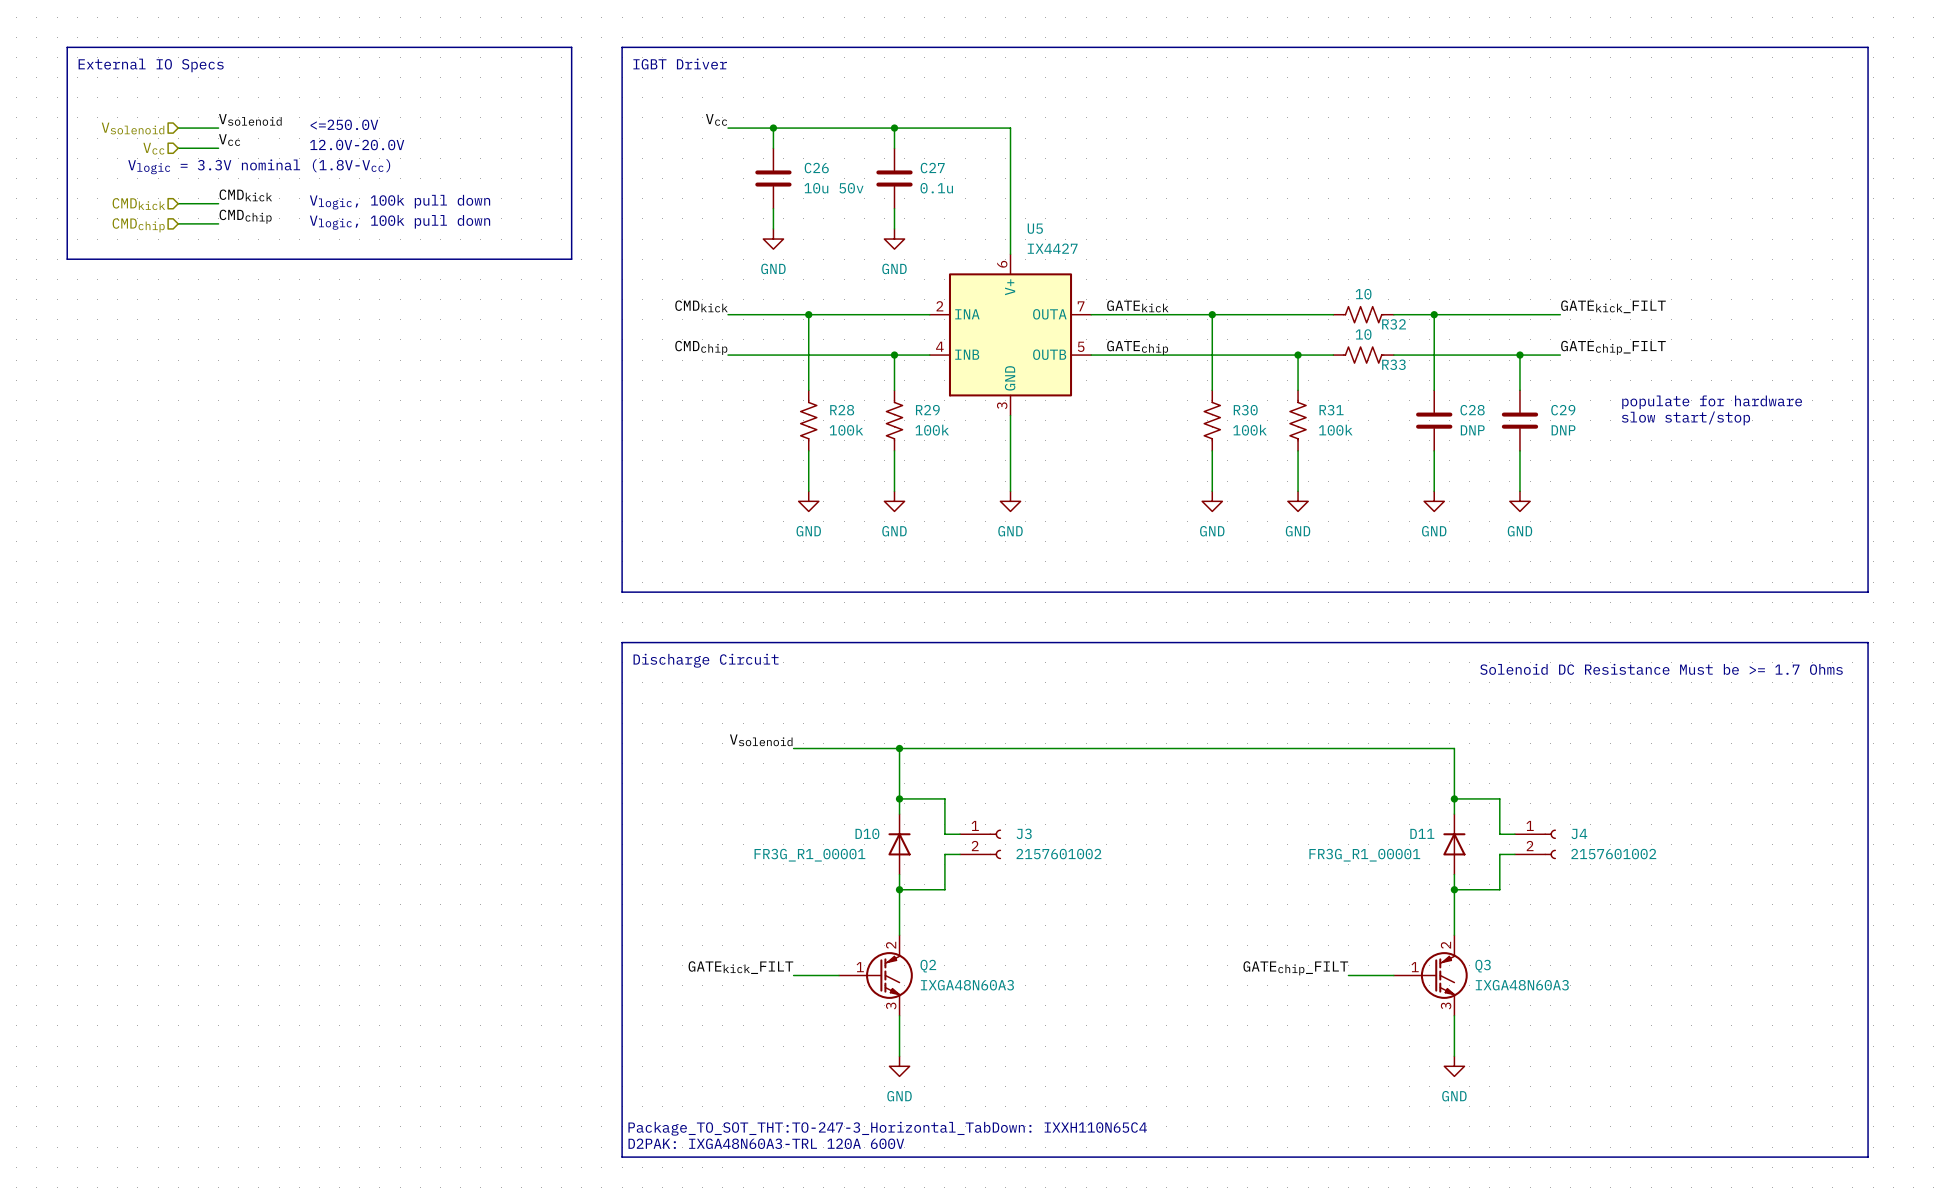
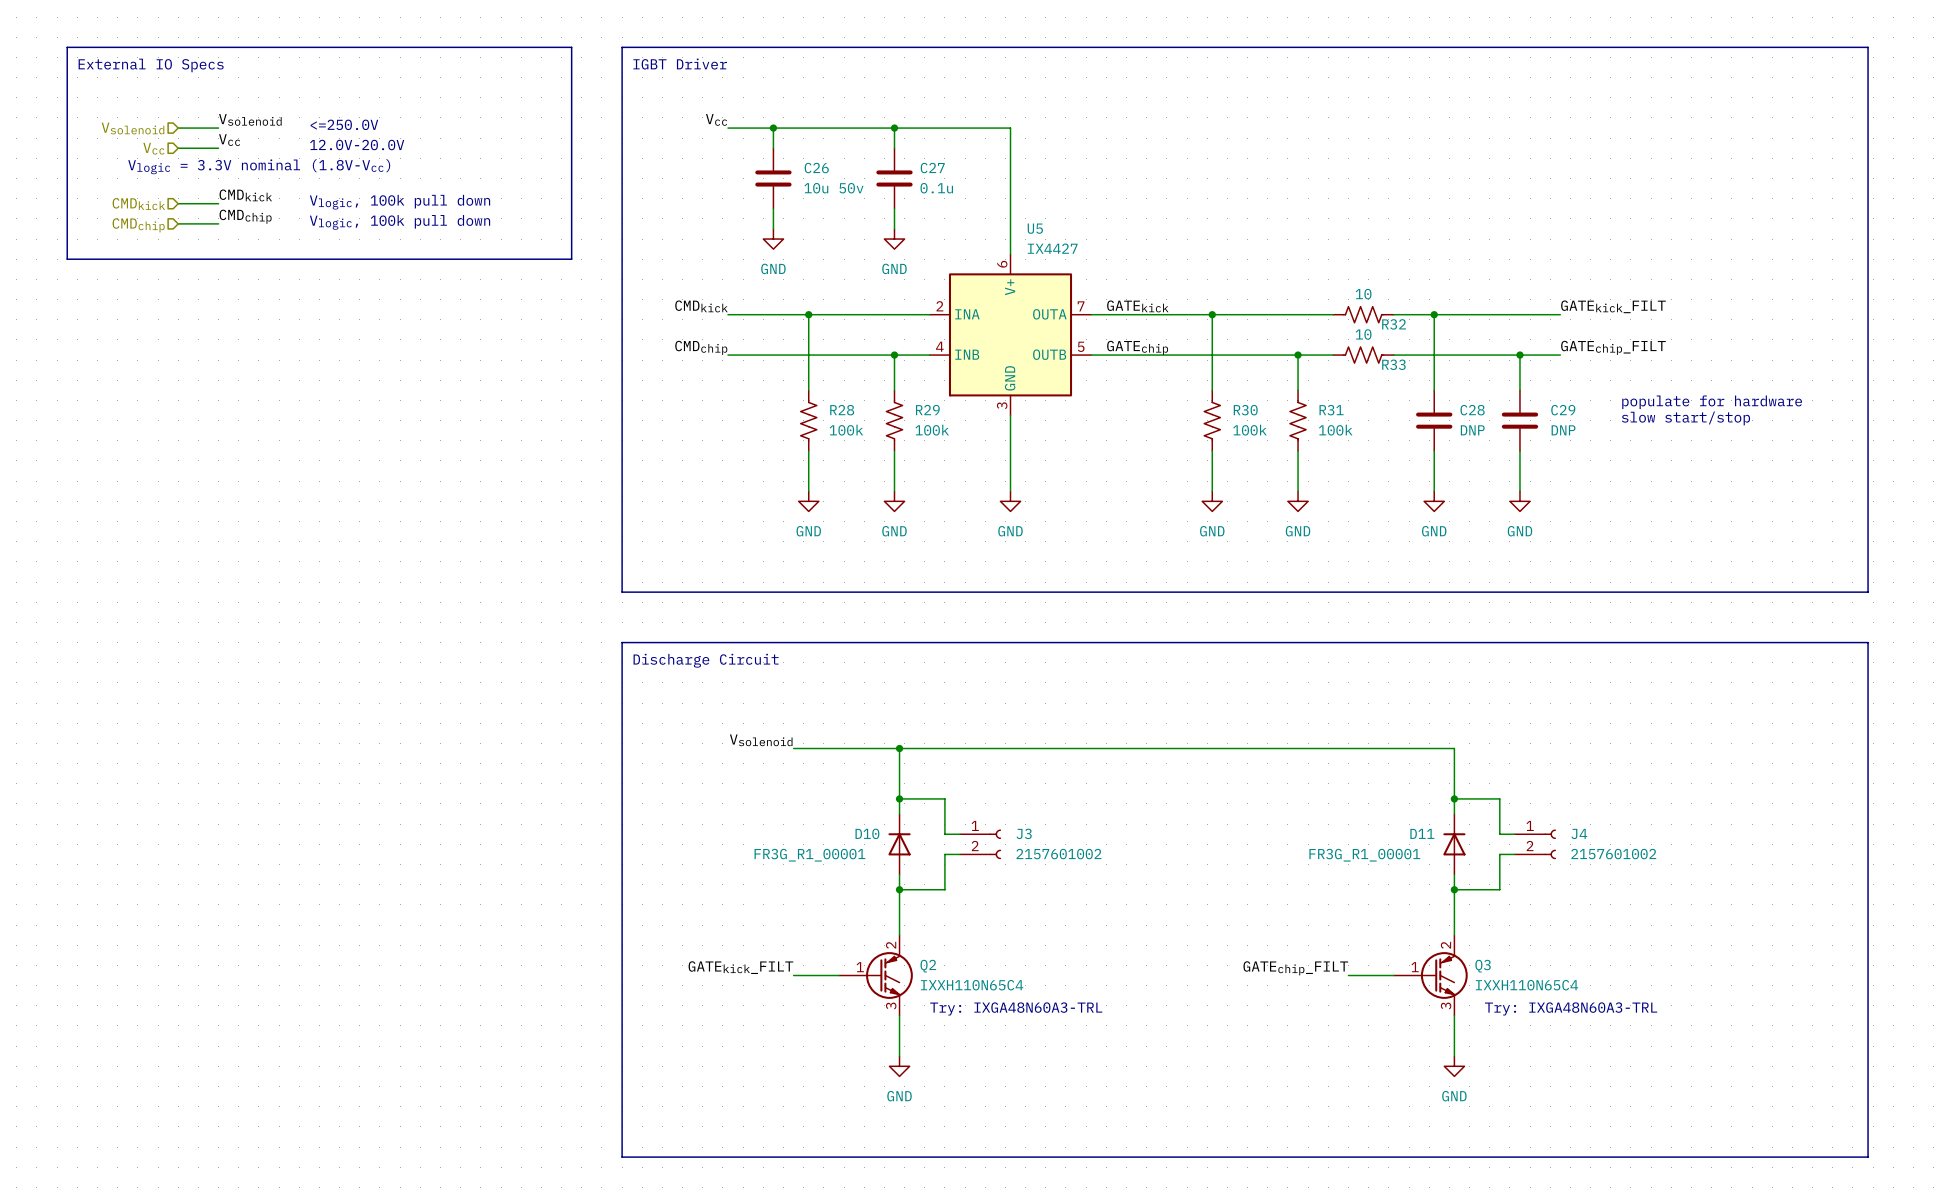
text: Solenoid DC Resistance Must be >= 1.7 Ohms (1661, 669) -> none
Q2 value: IXGA48N60A3 (967, 985) -> IXXH110N65C4 (972, 985)
Q3 value: IXGA48N60A3 (1522, 985) -> IXXH110N65C4 (1526, 985)
text: none -> Try: IXGA48N60A3-TRL (1016, 1008)
text: none -> Try: IXGA48N60A3-TRL (1571, 1008)
text: Package_TO_SOT_THT:TO-247-3_Horizontal_TabDown: IXXH110N65C4 (887, 1128) -> none
text: D2PAK: IXGA48N60A3-TRL 120A 600V (766, 1143) -> none

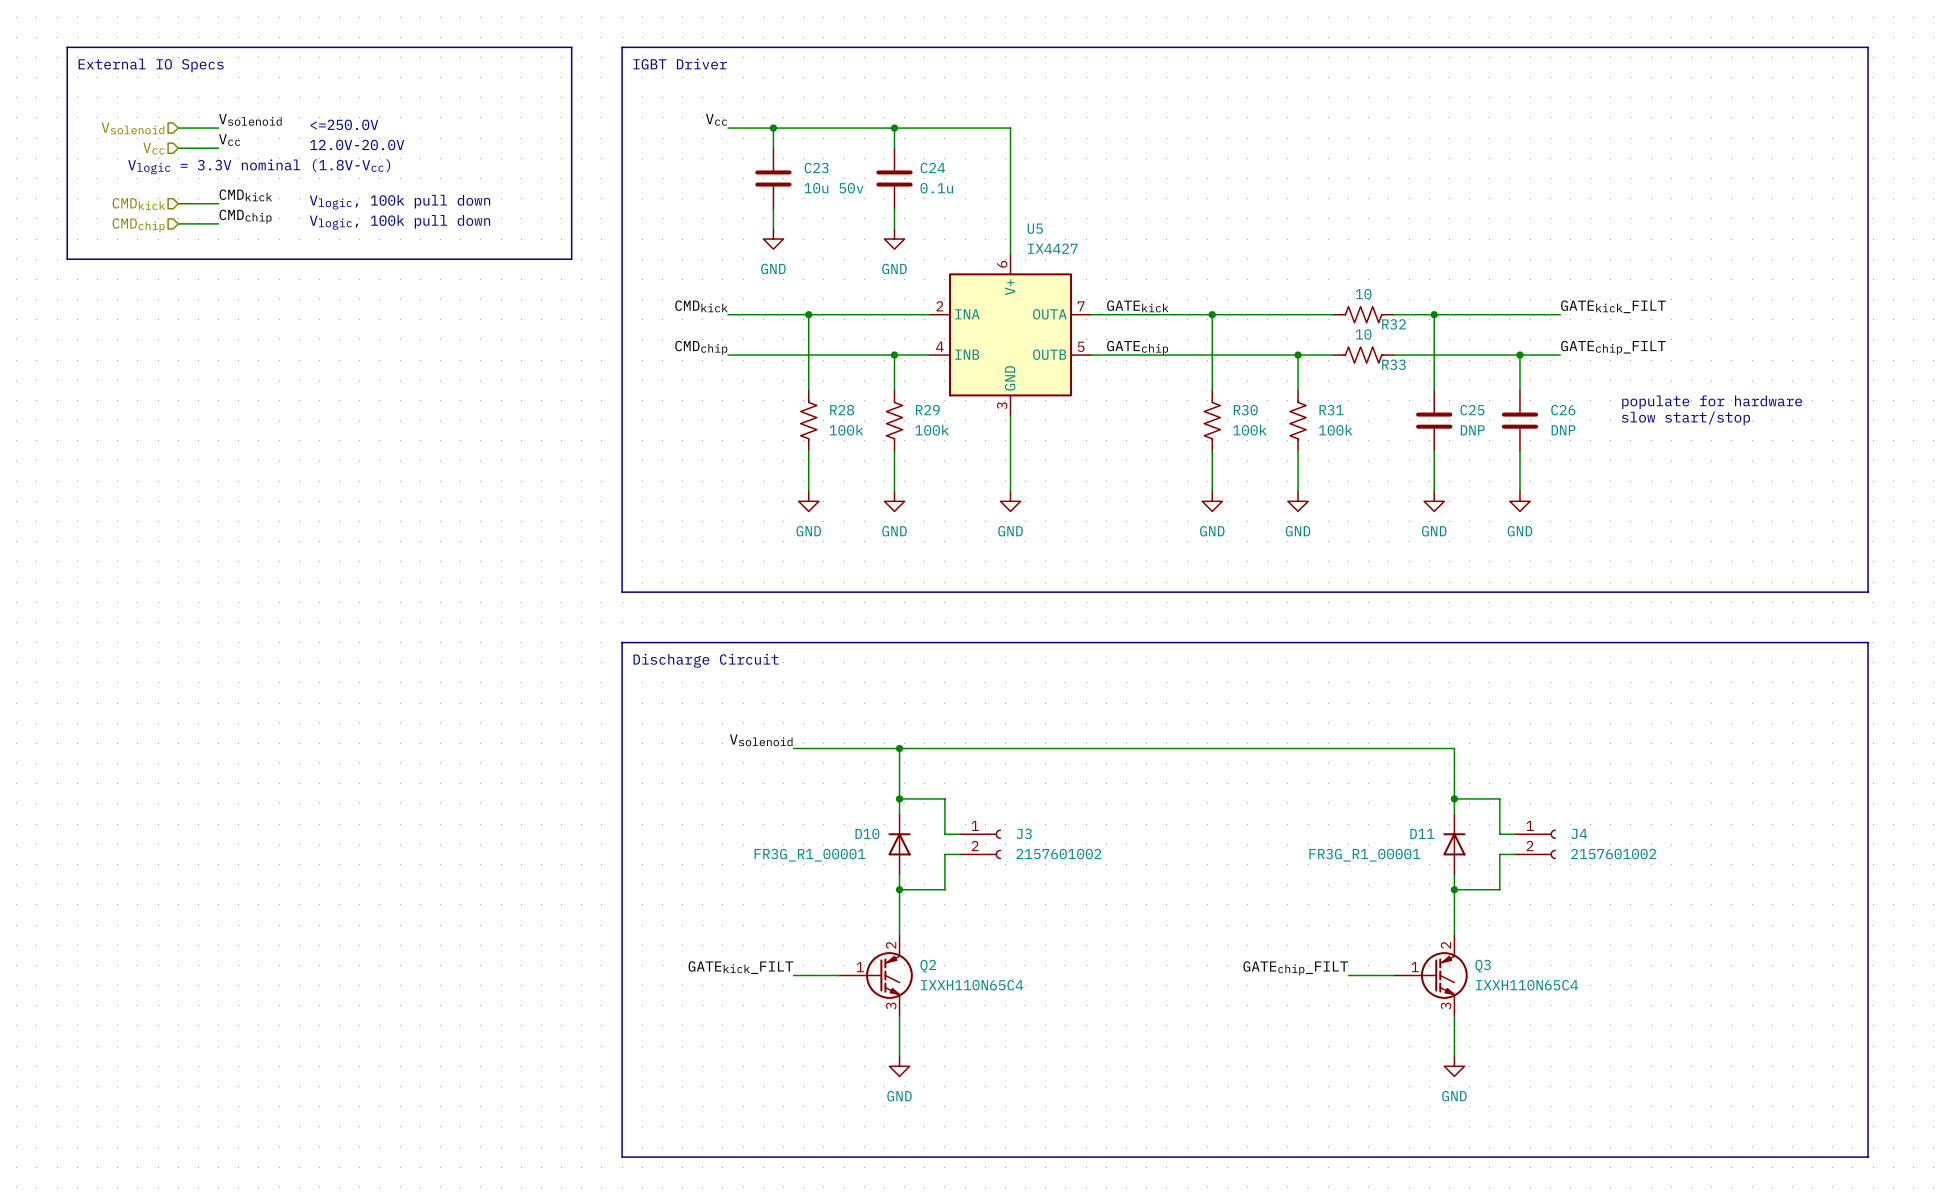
C26 name: C26 (816, 168) -> C23 (816, 168)
C27 name: C27 (932, 168) -> C24 (932, 168)
C28 name: C28 (1472, 410) -> C25 (1472, 410)
C29 name: C29 (1563, 410) -> C26 (1563, 410)
text: Try: IXGA48N60A3-TRL (1016, 1008) -> none
text: Try: IXGA48N60A3-TRL (1571, 1008) -> none

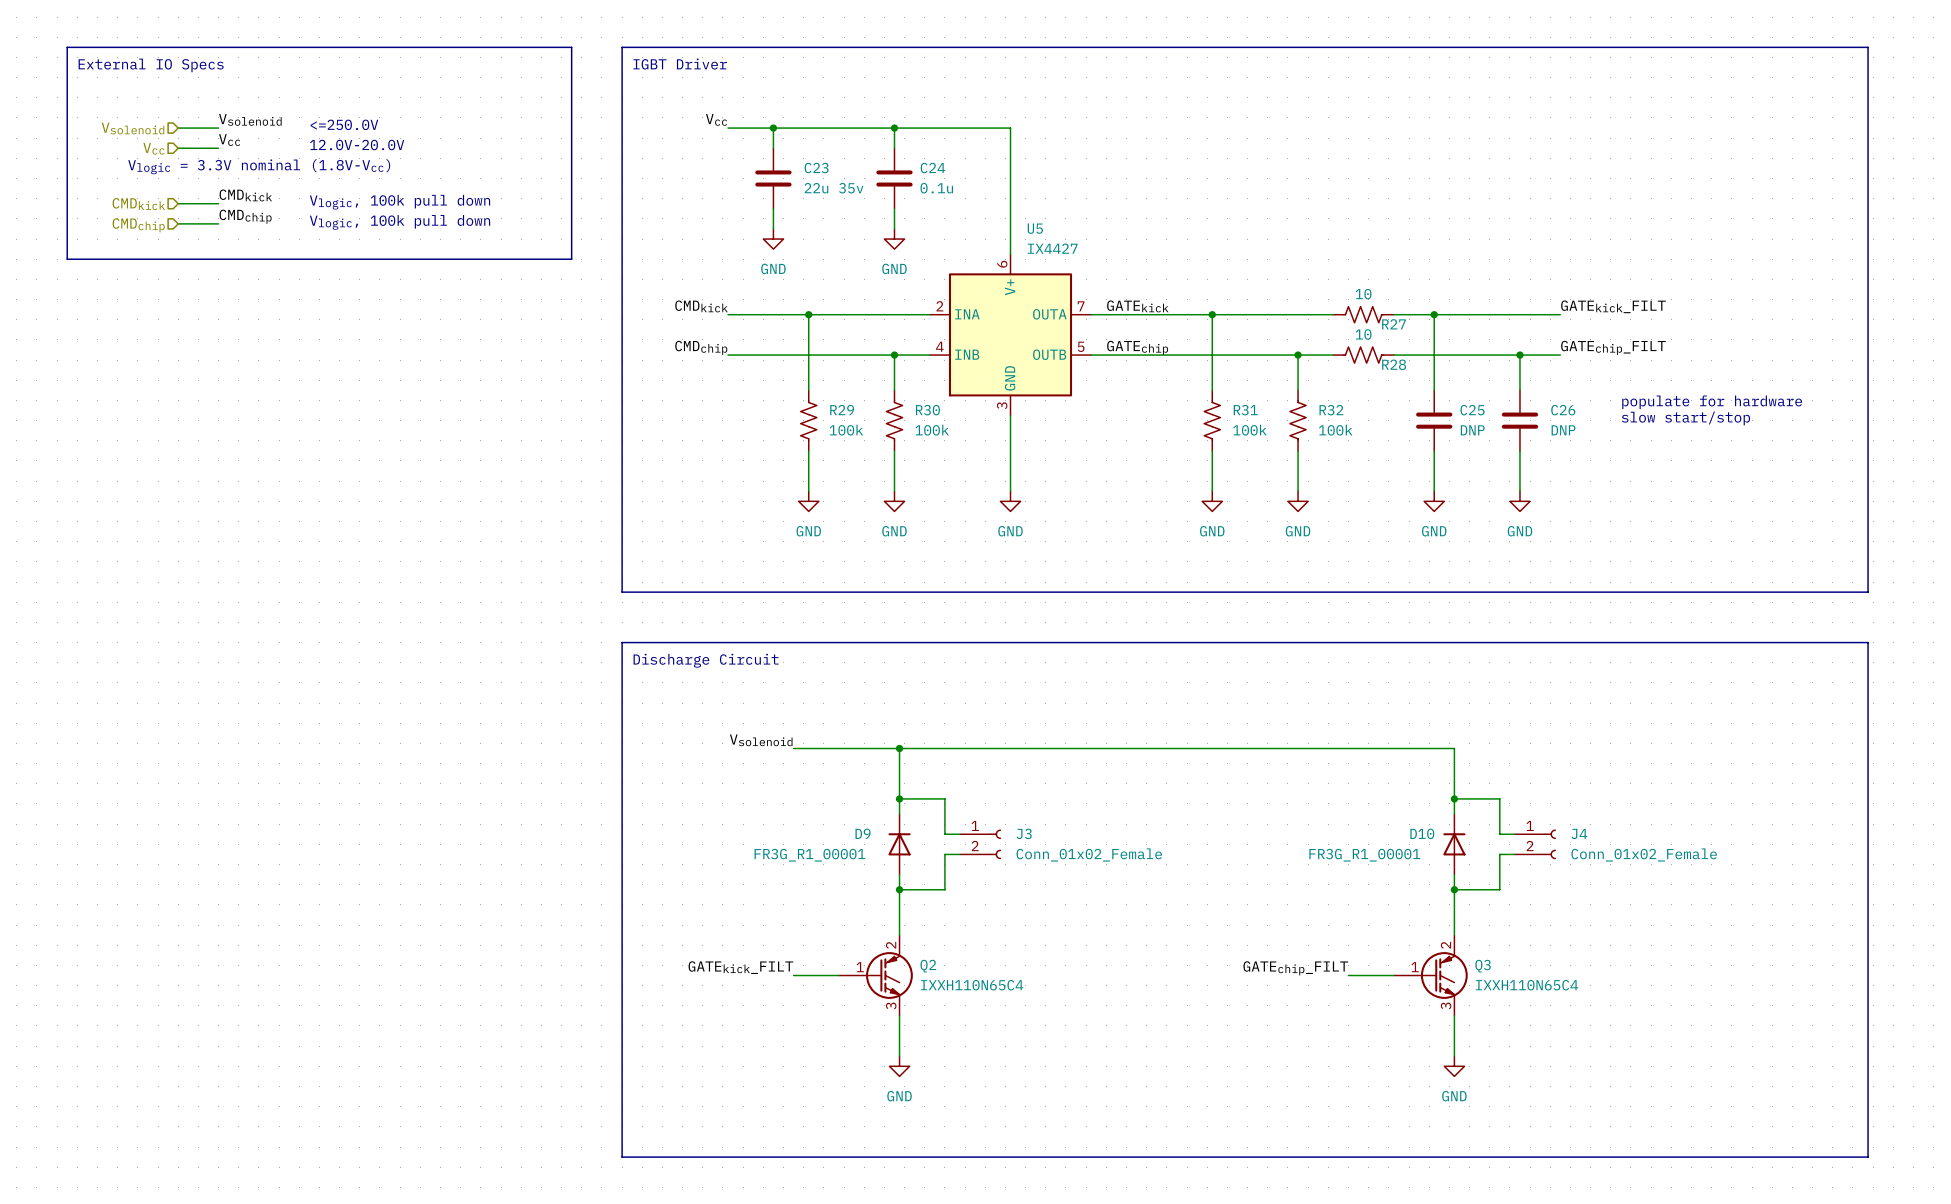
C23 value: 10u 50v (833, 188) -> 22u 35v (834, 188)
R32 name: R32 (1394, 324) -> R27 (1394, 324)
R33 name: R33 (1393, 364) -> R28 (1394, 364)
R28 name: R28 (842, 410) -> R29 (842, 410)
R29 name: R29 (927, 410) -> R30 (927, 410)
R30 name: R30 (1245, 410) -> R31 (1245, 410)
R31 name: R31 (1331, 410) -> R32 (1331, 410)
D10 name: D10 (867, 833) -> D9 (863, 833)
D11 name: D11 (1422, 833) -> D10 (1422, 833)
J3 value: 2157601002 (1058, 854) -> Conn_01x02_Female (1089, 854)
J4 value: 2157601002 (1613, 854) -> Conn_01x02_Female (1644, 854)

